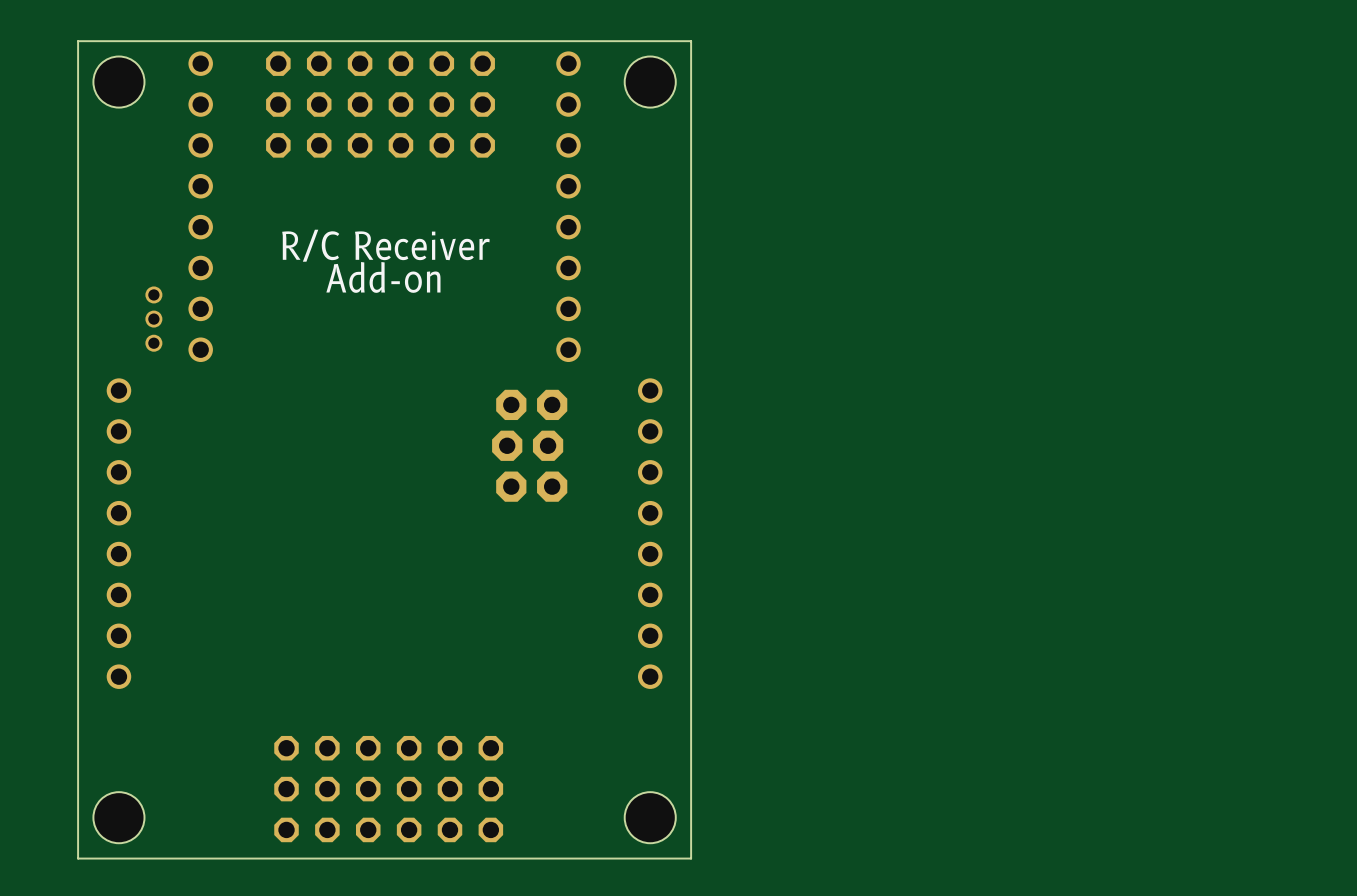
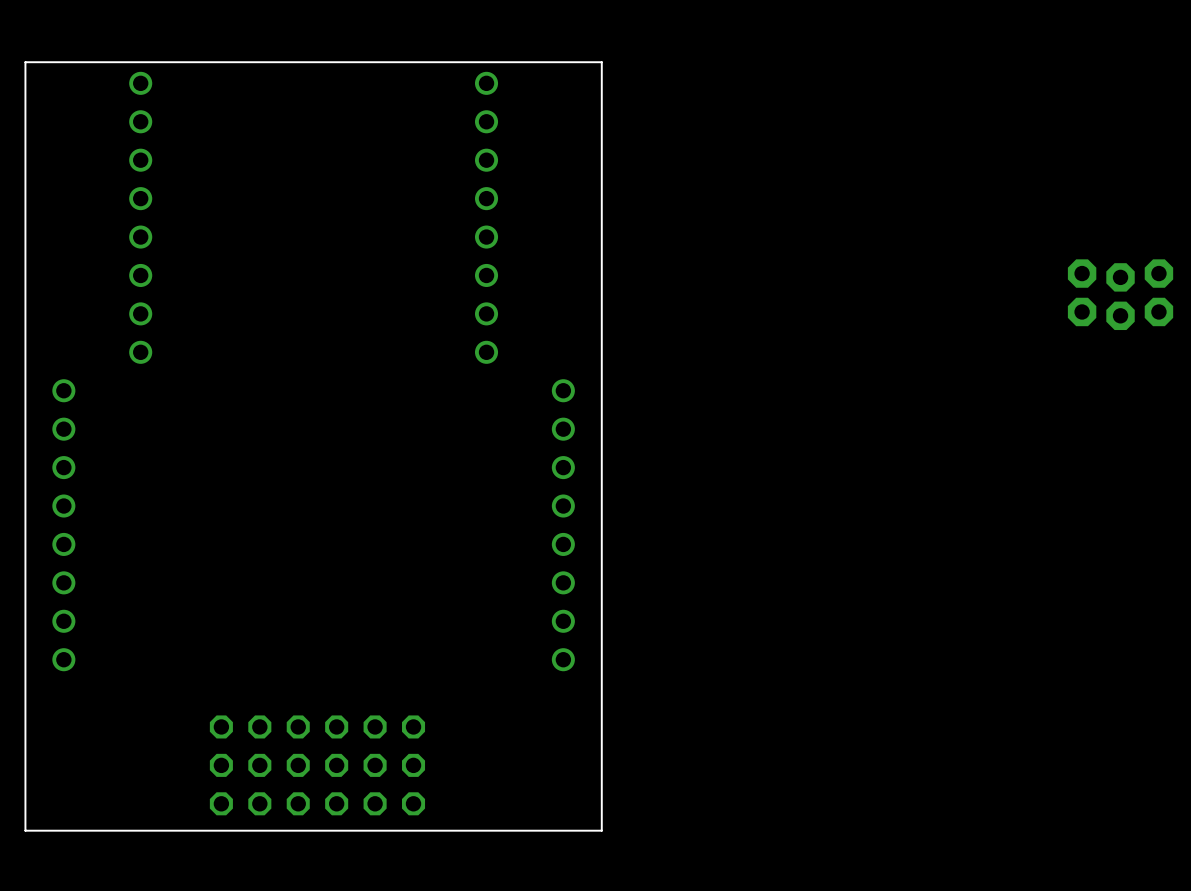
hole: (118, 82) -> none
hole: (650, 82) -> none
part: (380, 104) -> none
text: R/C Receiver (385, 245) -> none
text: Add-on (383, 277) -> none
part: none -> (1120, 294)
part: (153, 319) -> none
part: (529, 445) -> none
hole: (118, 817) -> none
hole: (650, 817) -> none

